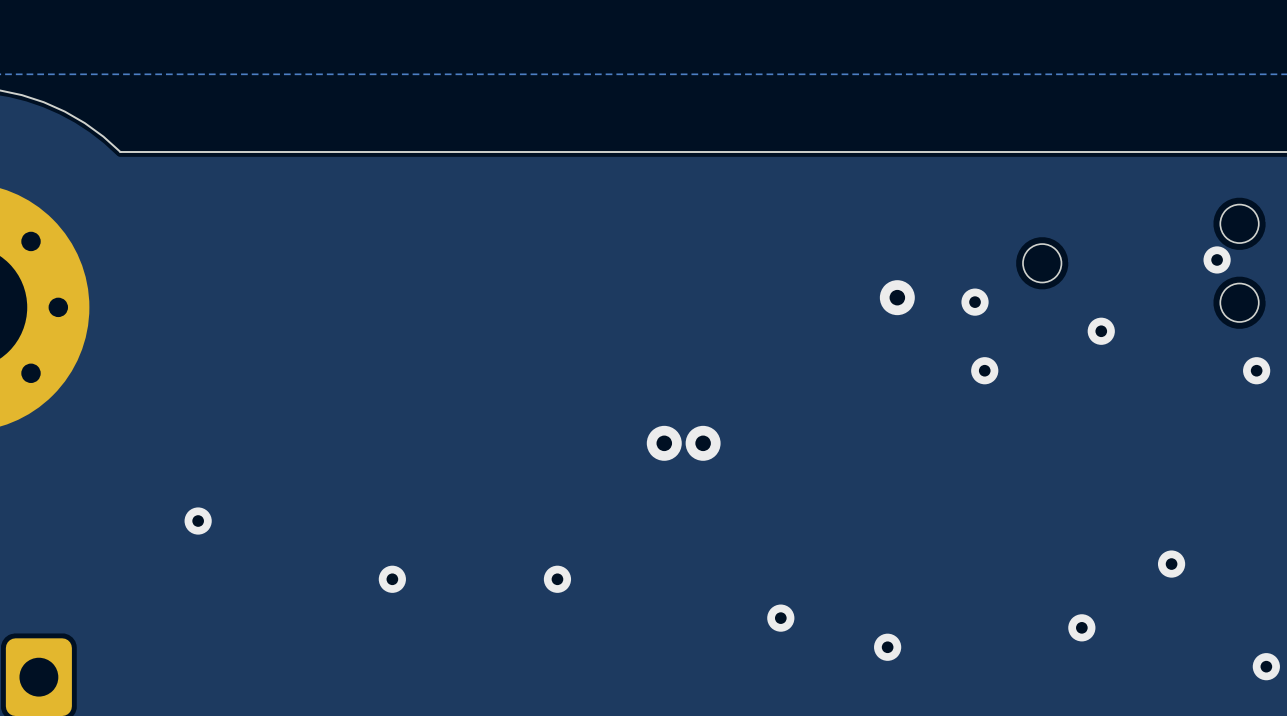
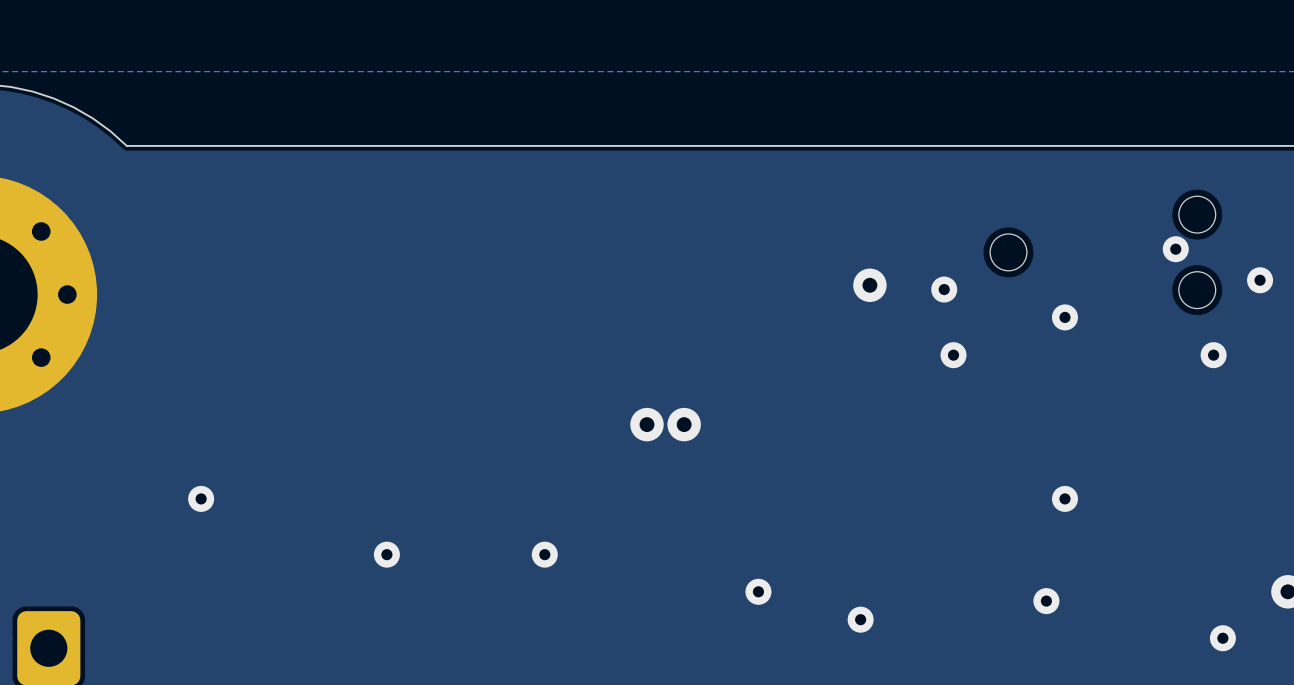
via position: (1171, 564) -> (1064, 498)

